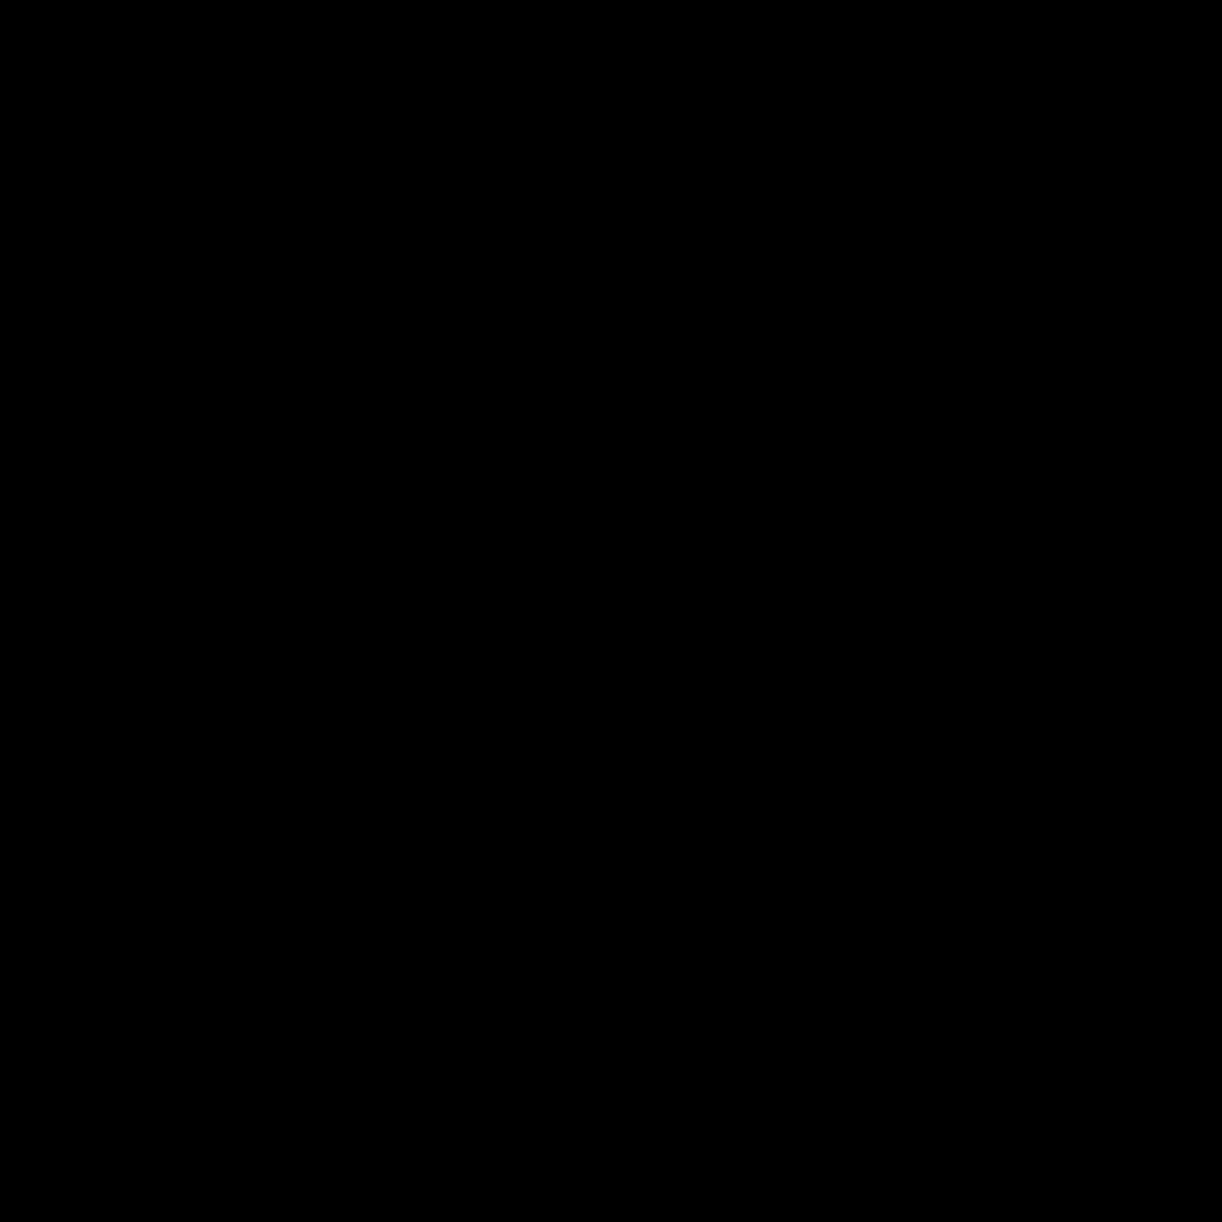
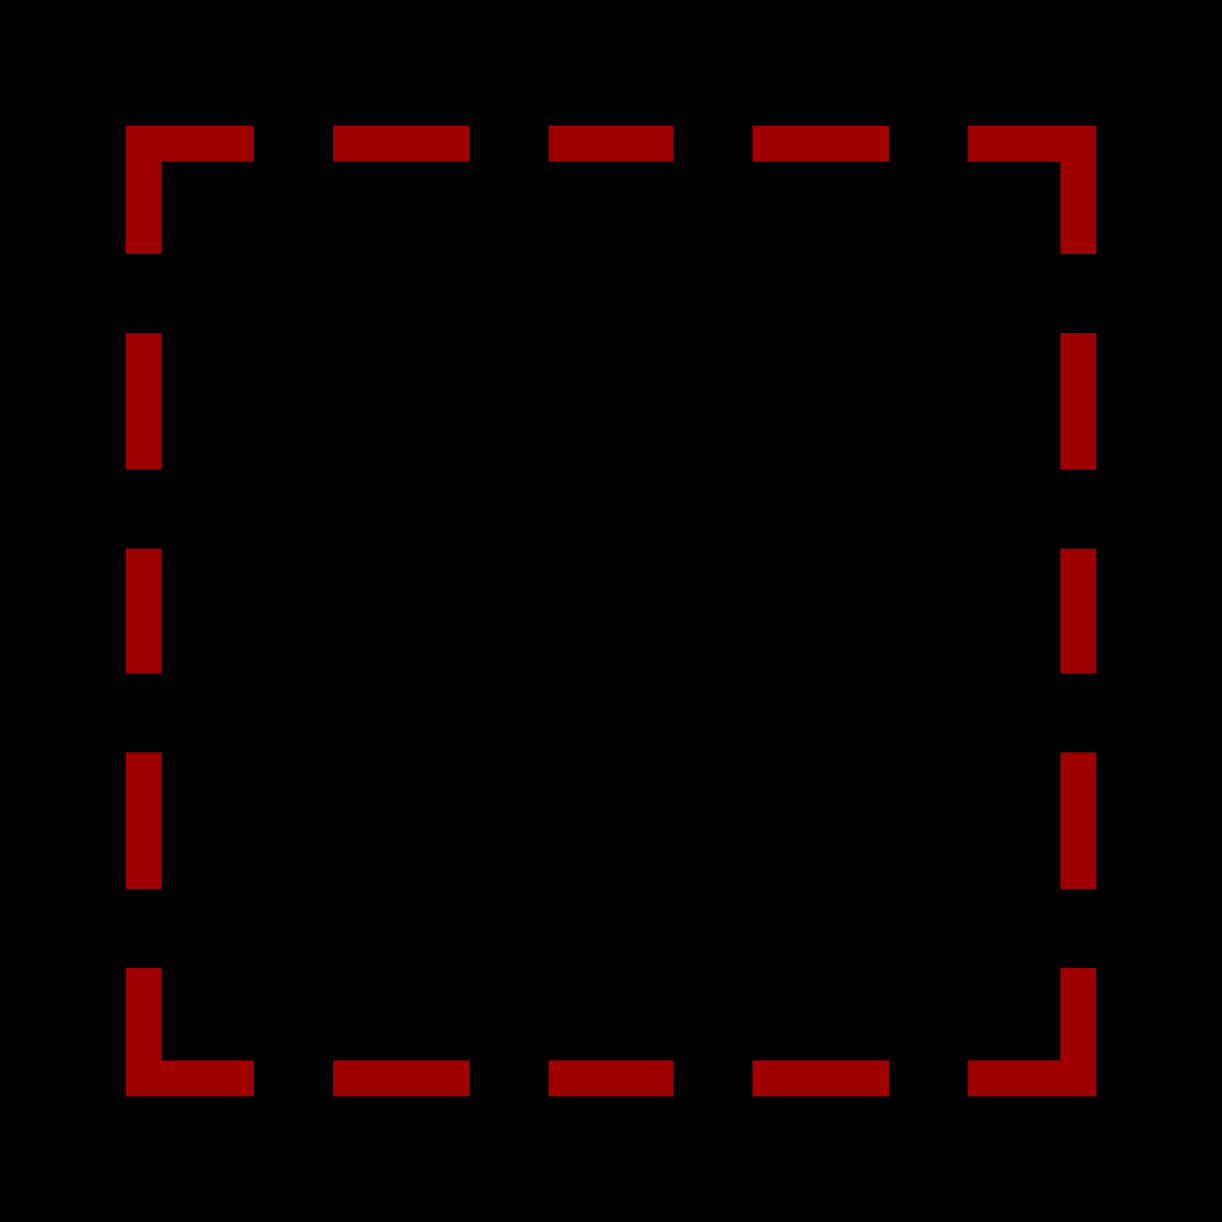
part: none -> (610, 610)

